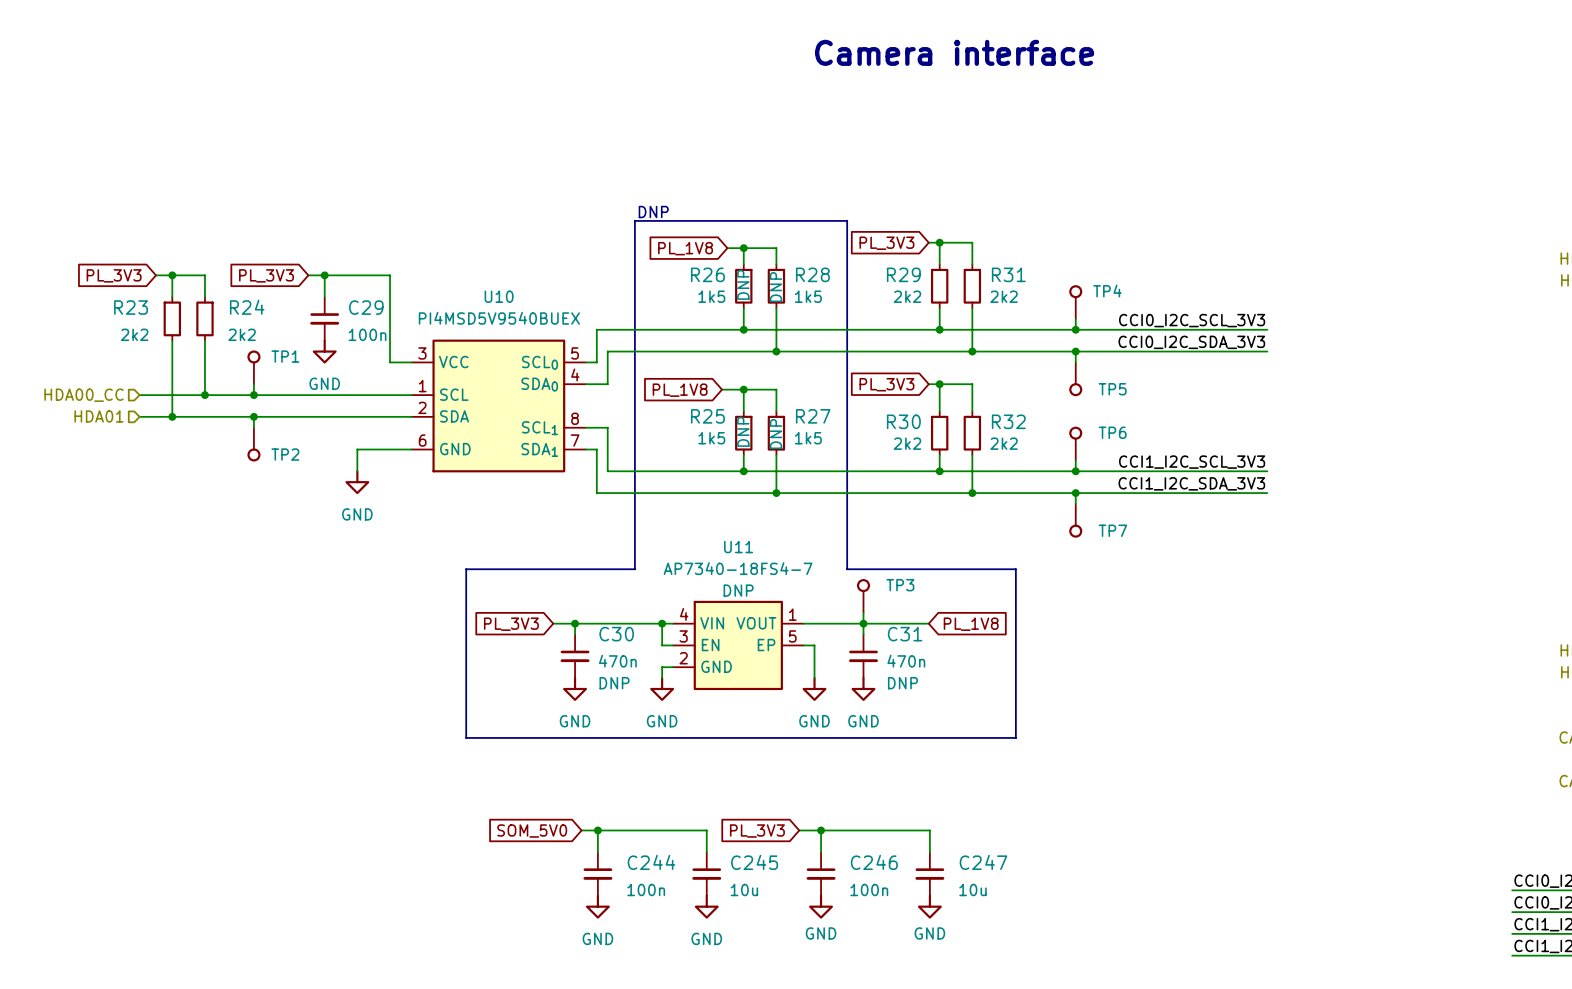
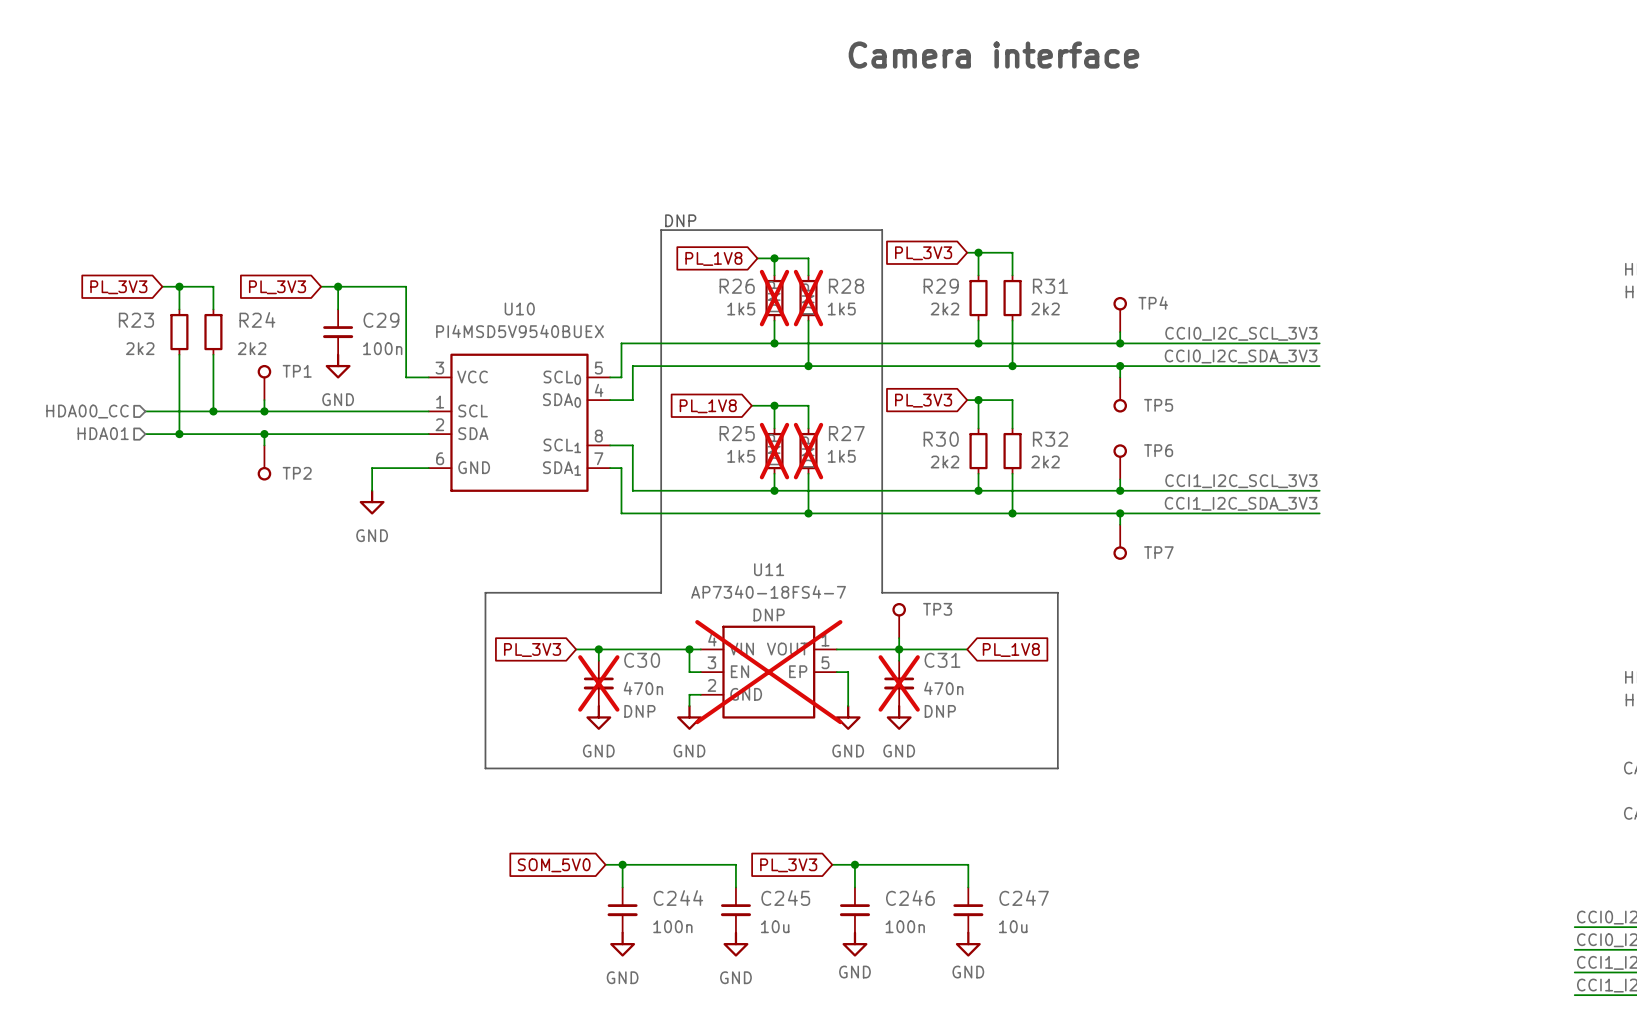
R26 do-not-place cross: none -> (774, 298)
R28 do-not-place cross: none -> (808, 298)
R25 do-not-place cross: none -> (774, 451)
R27 do-not-place cross: none -> (808, 451)
U11 do-not-place cross: none -> (768, 672)
C30 do-not-place cross: none -> (598, 683)
C31 do-not-place cross: none -> (899, 683)

